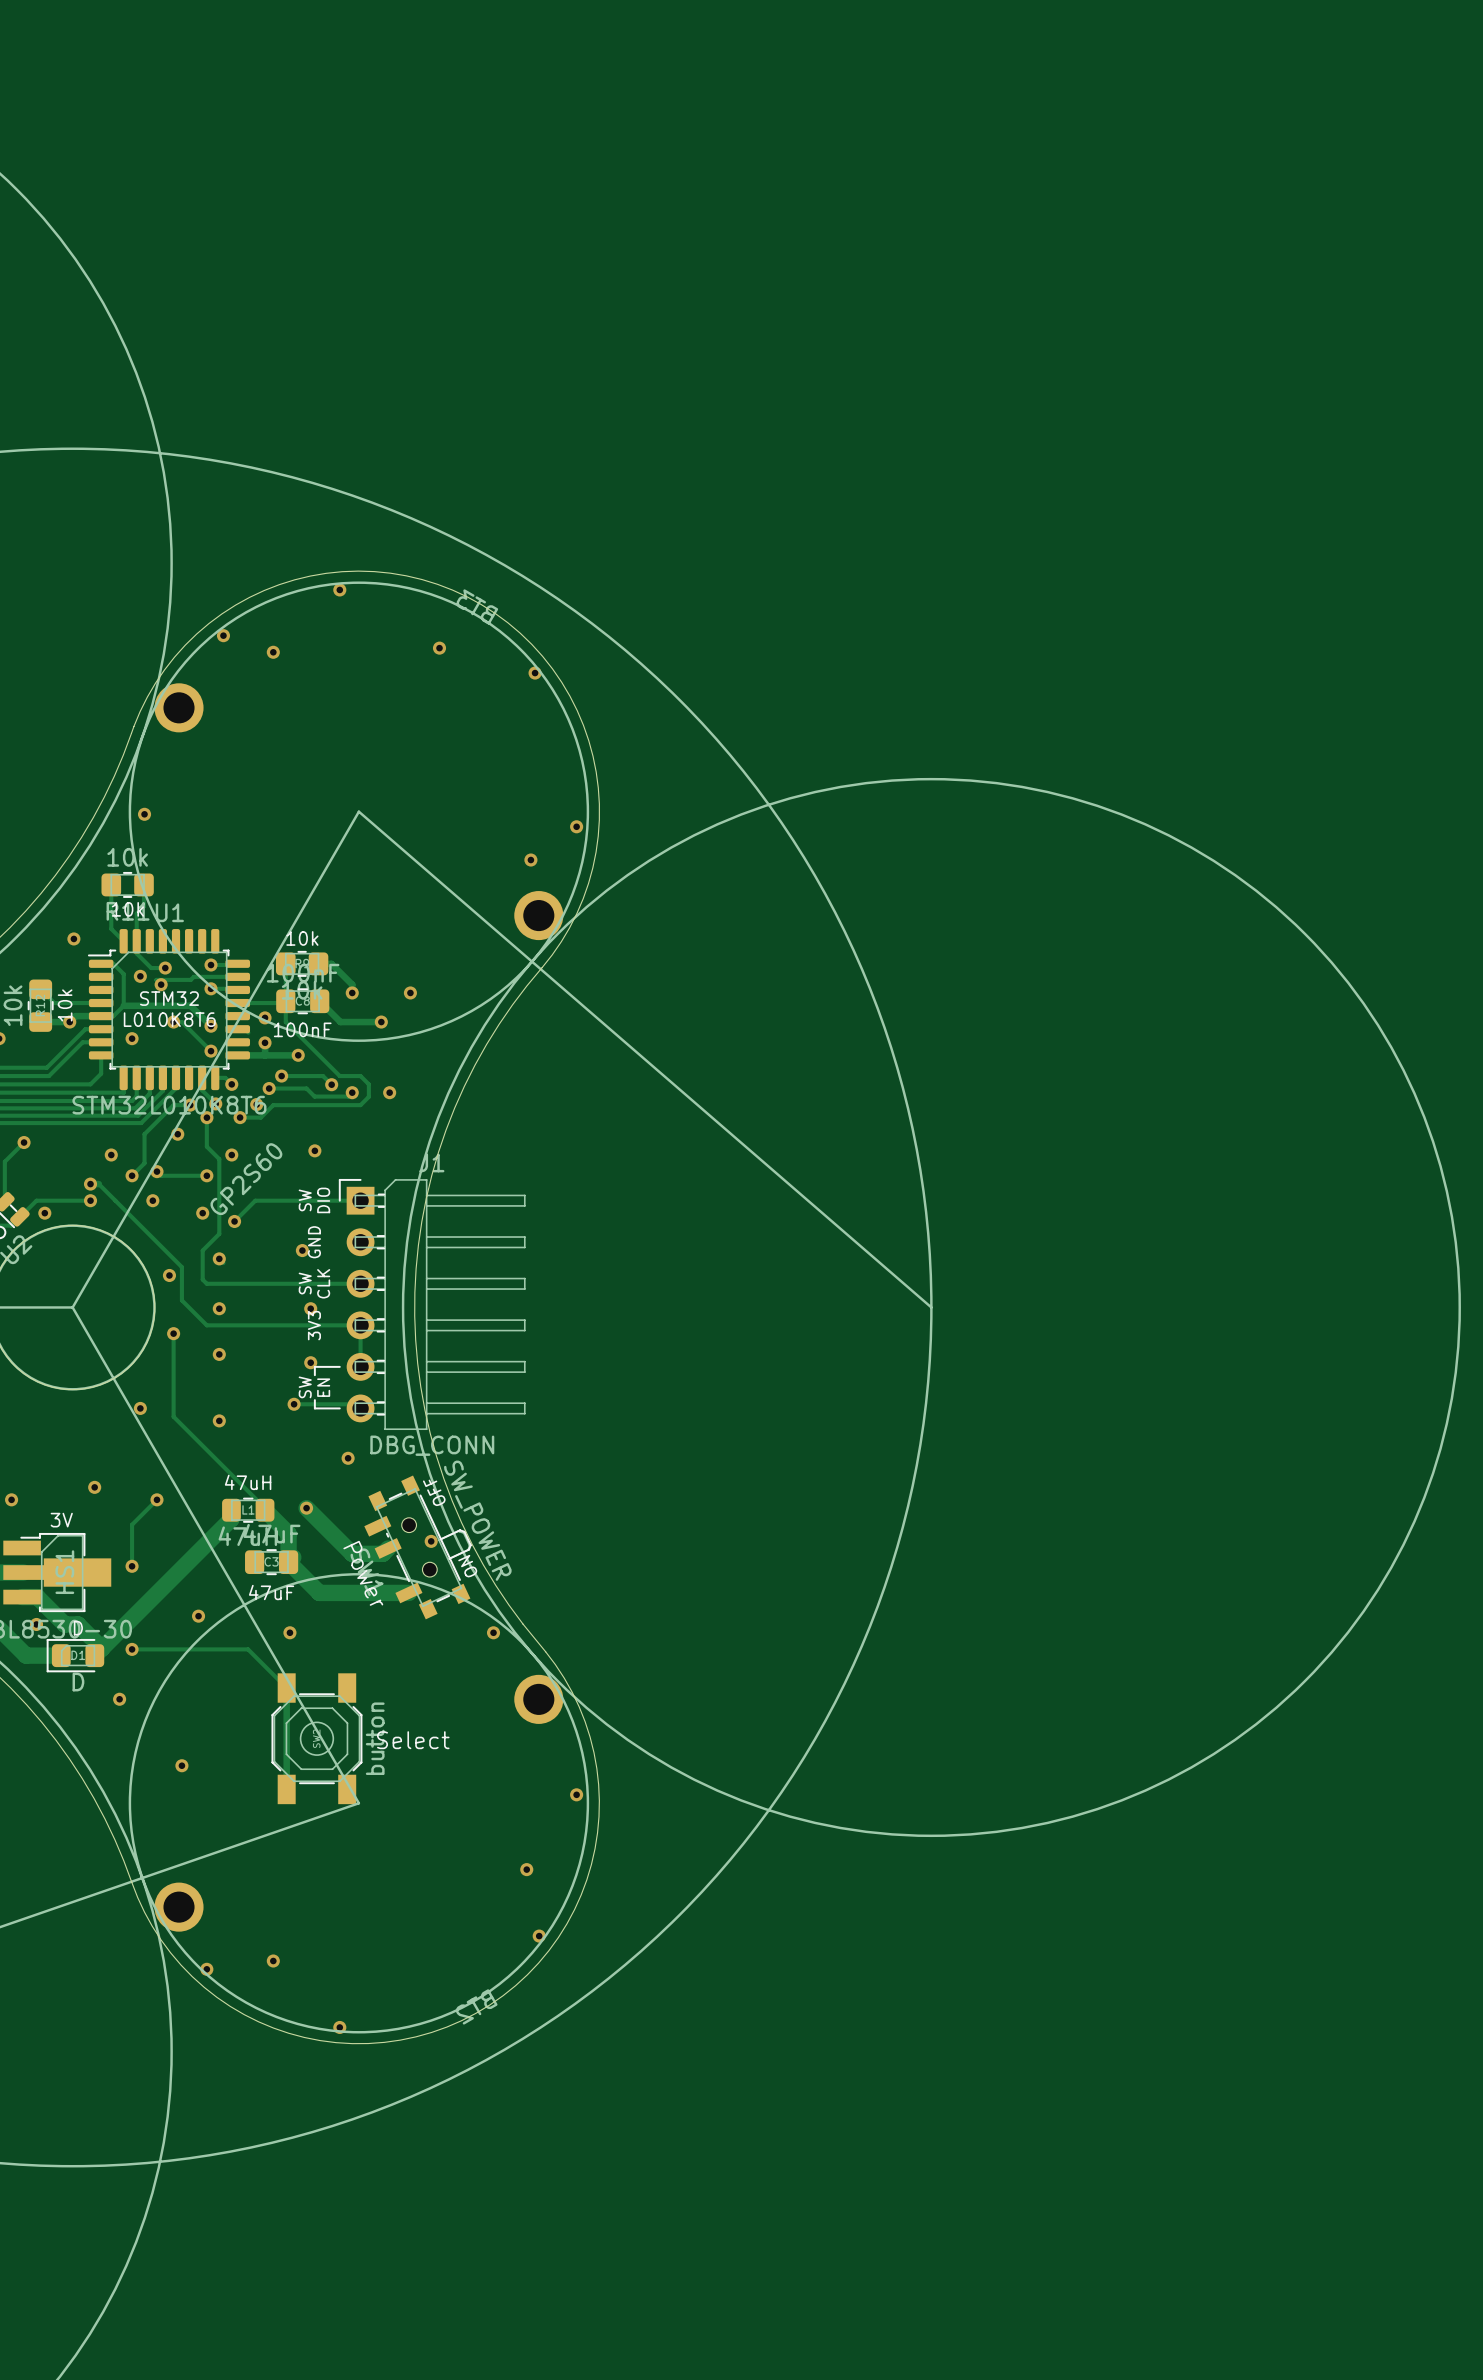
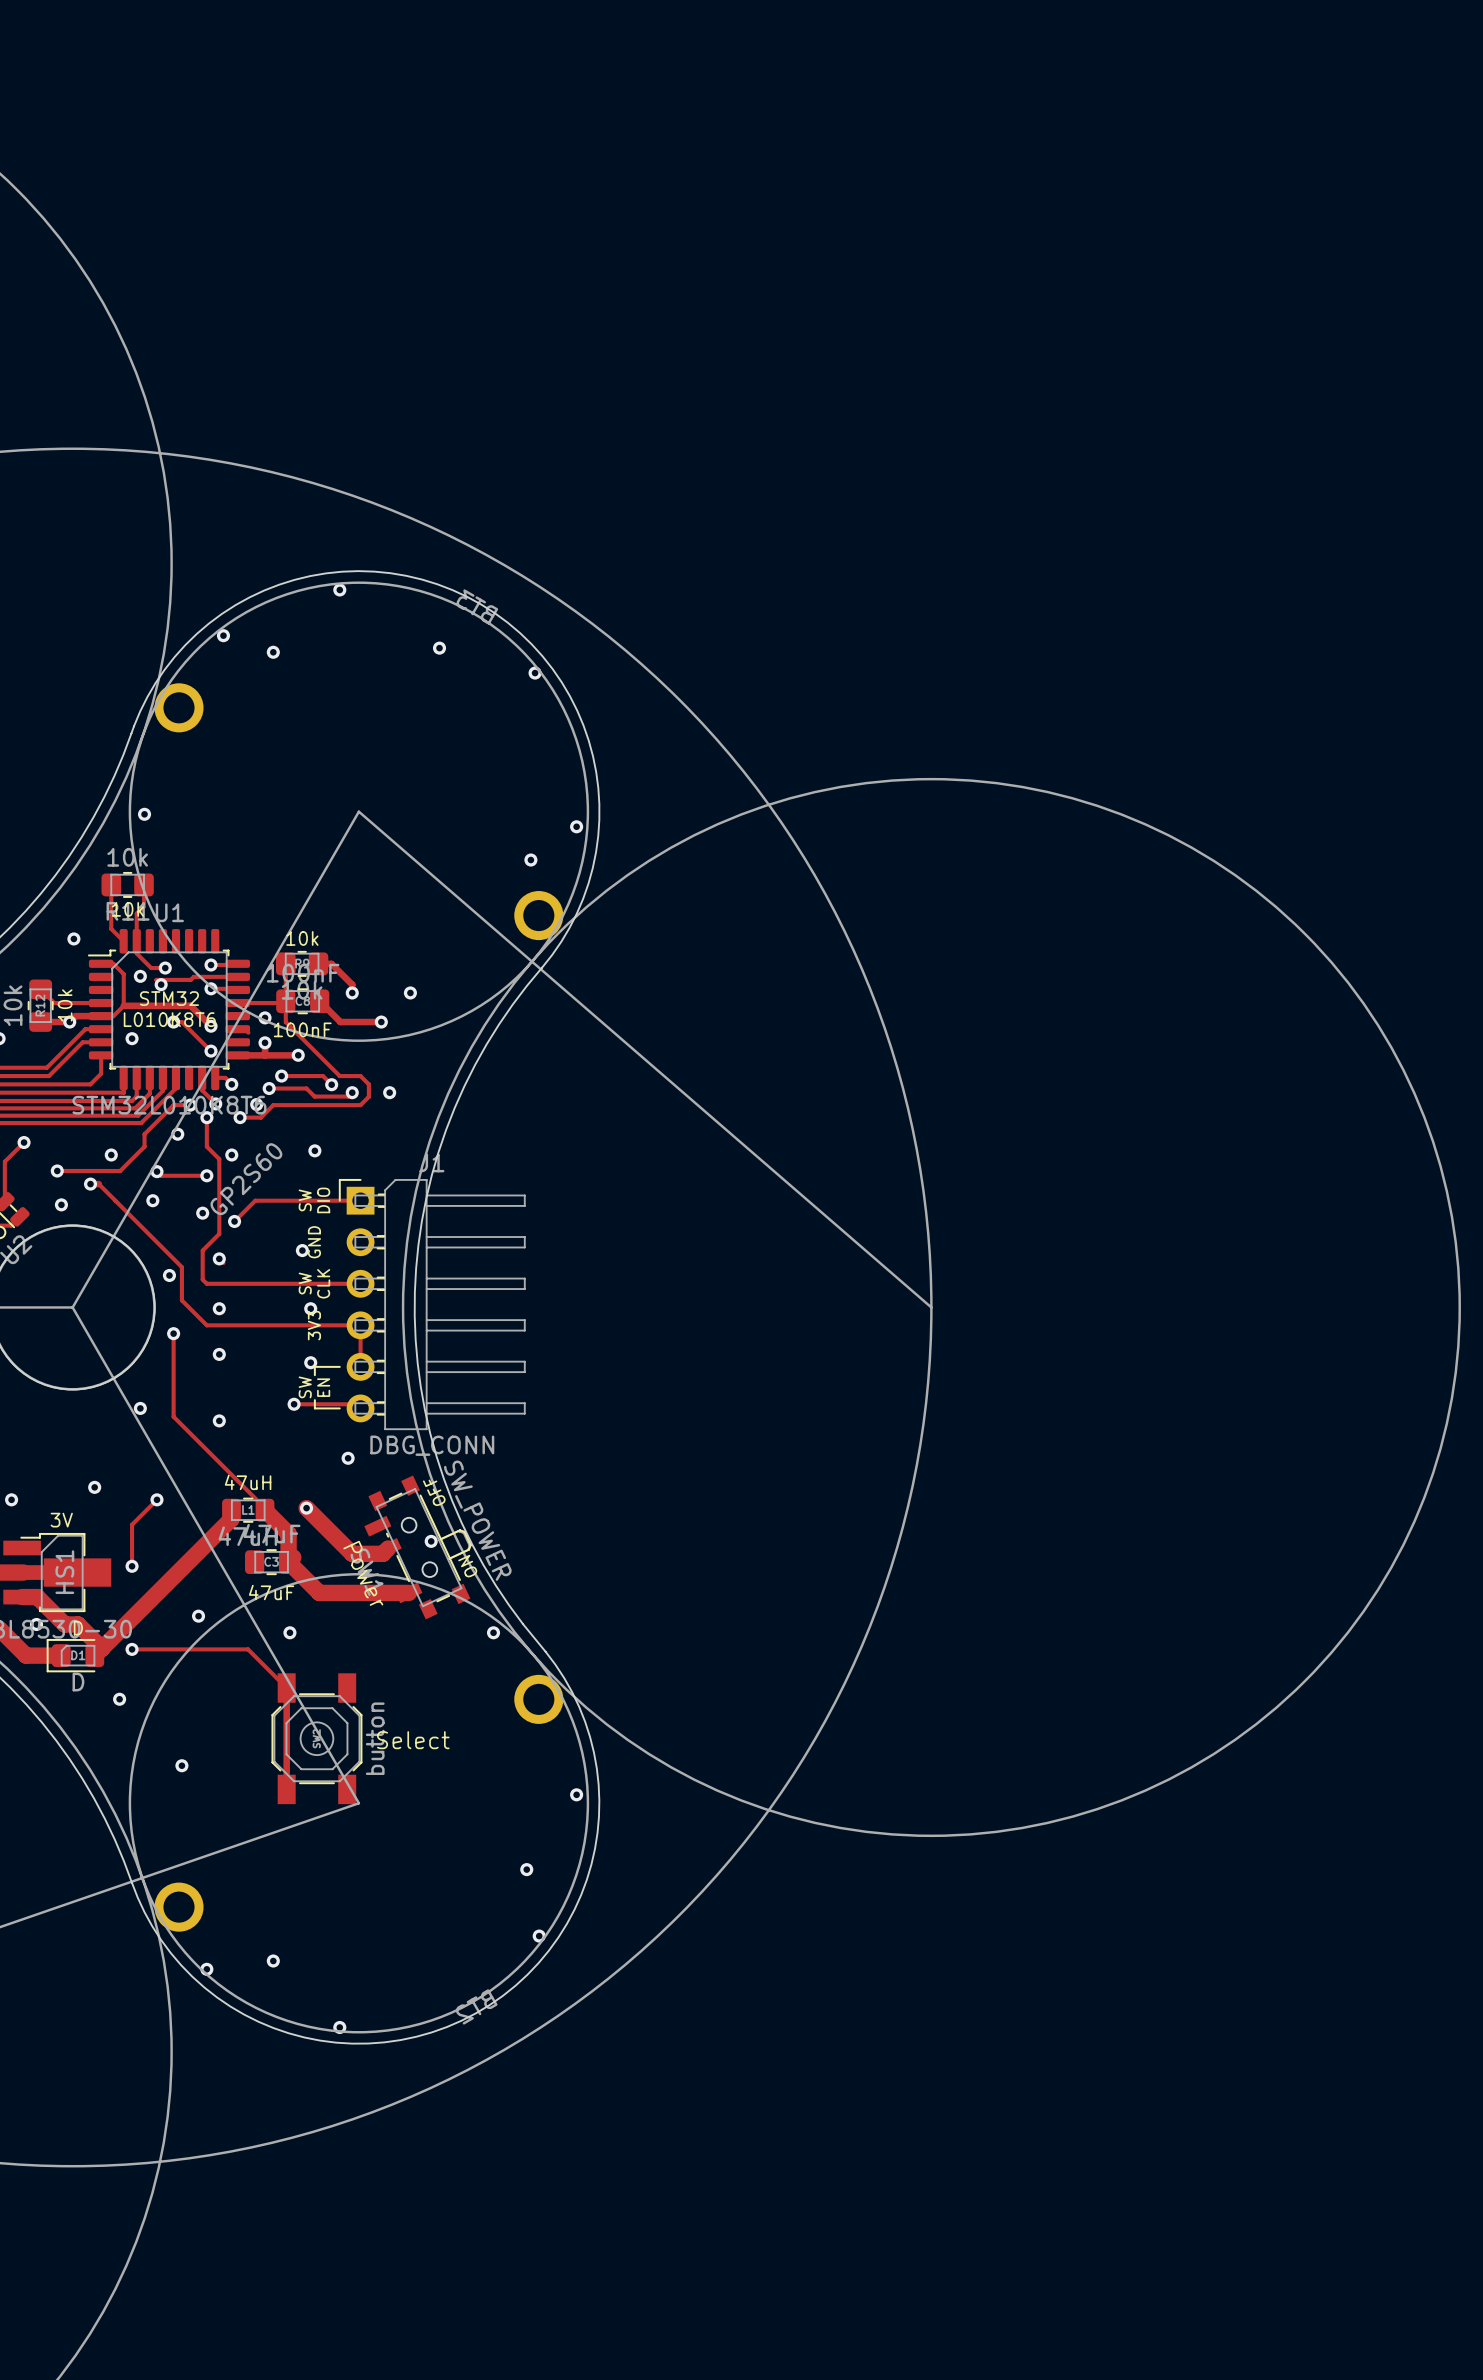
track: (144, 1146) (144, 1163) (132, 1175) -> (144, 1146) (120, 1170) (57, 1170)
via: none -> (57, 1170)
via: (132, 1175) -> none
track: (90, 1200) (36, 1200) (20, 1216) -> none
via: (90, 1200) -> none
via: none -> (61, 1204)
via: (44, 1213) -> none

